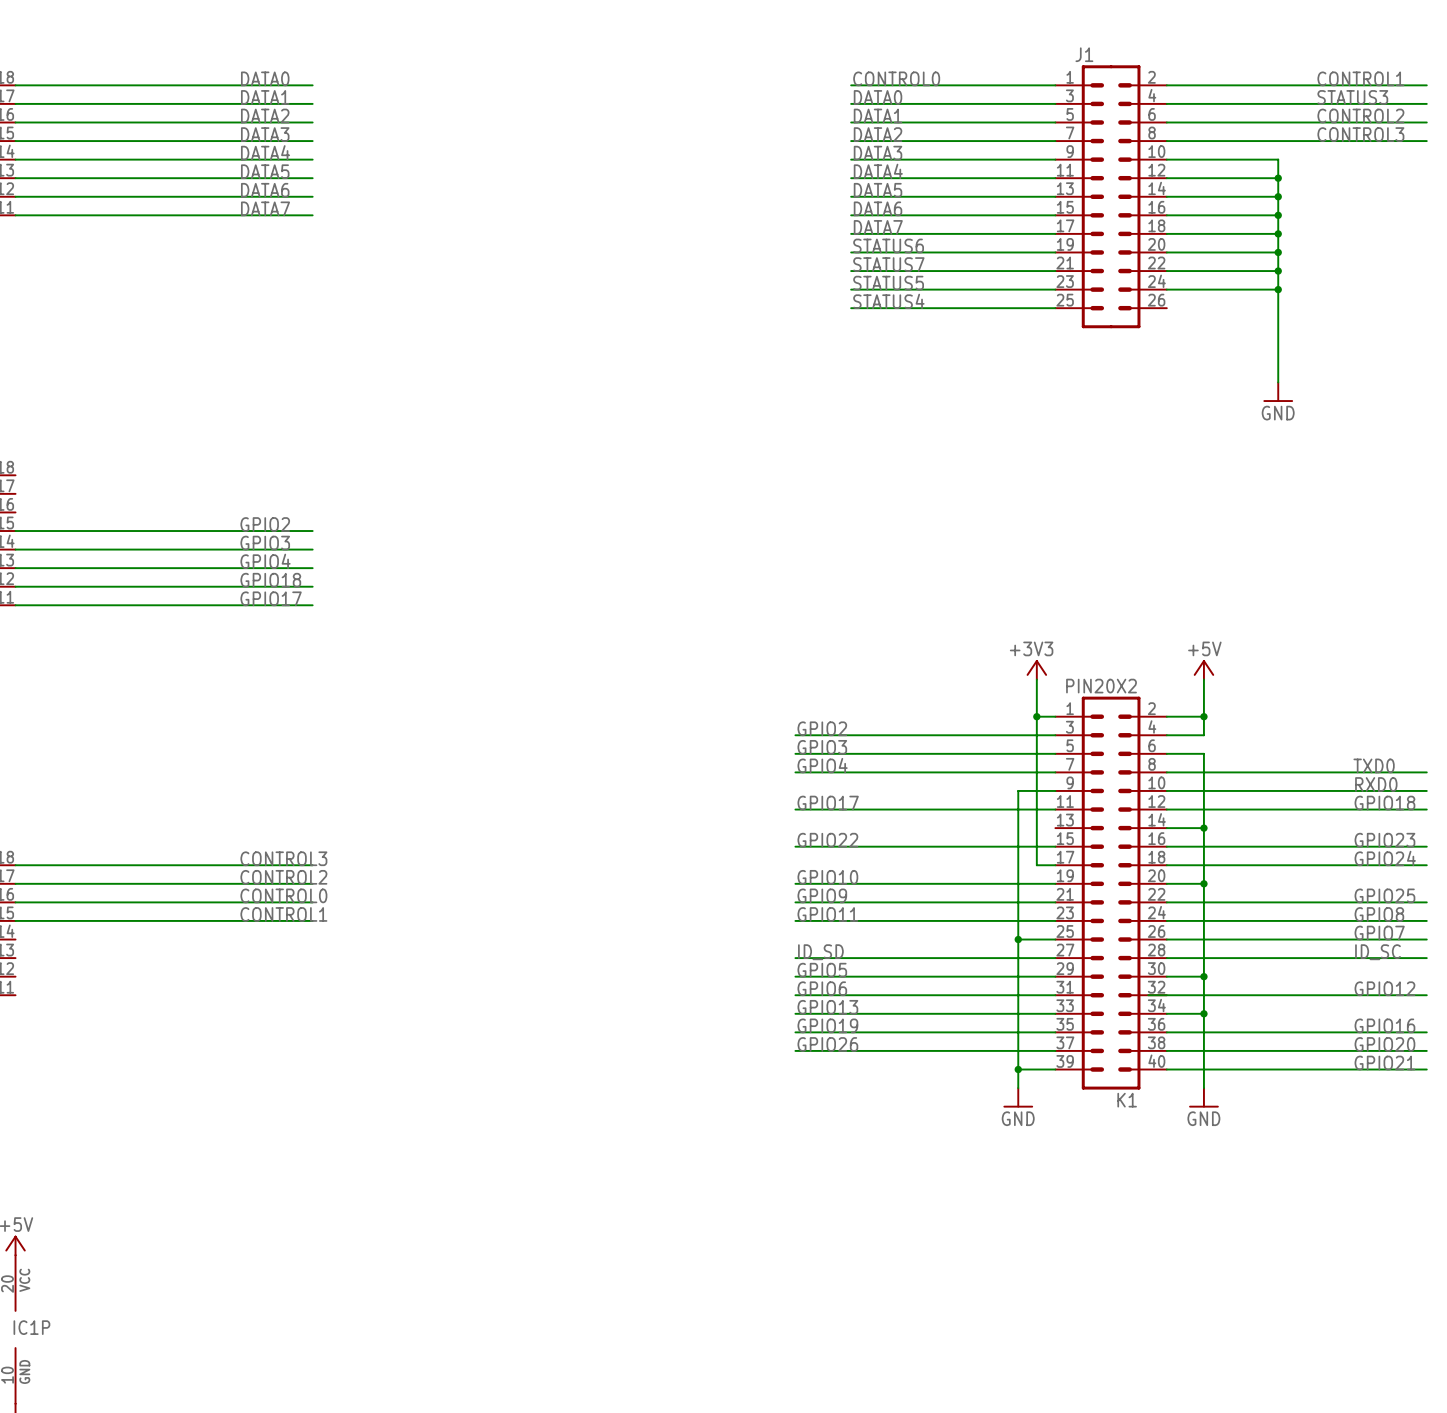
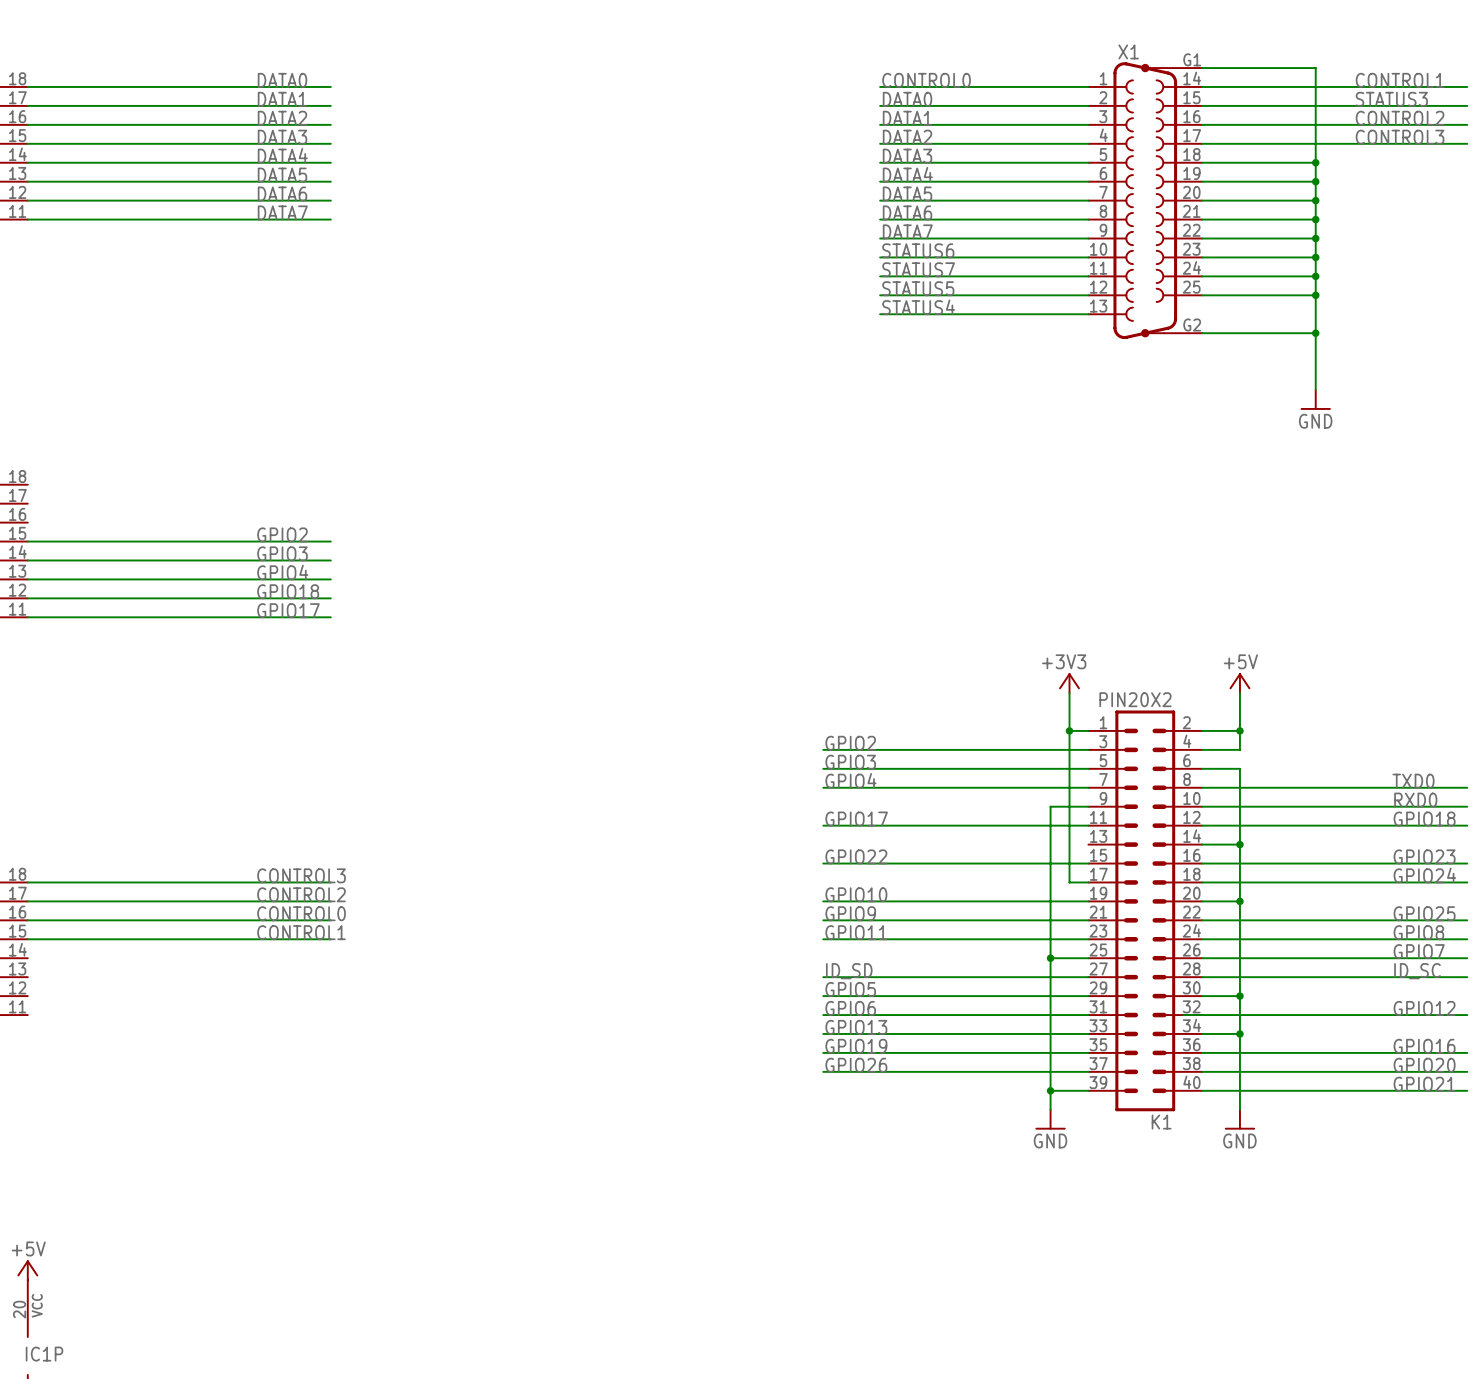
wire: none -> (1202, 68) (1315, 68) (1315, 162)
junction: none -> (1315, 162)
J1: (1111, 196) -> none
X1: none -> (1145, 200)
wire: none -> (1202, 333) (1315, 333)
junction: none -> (1315, 333)

